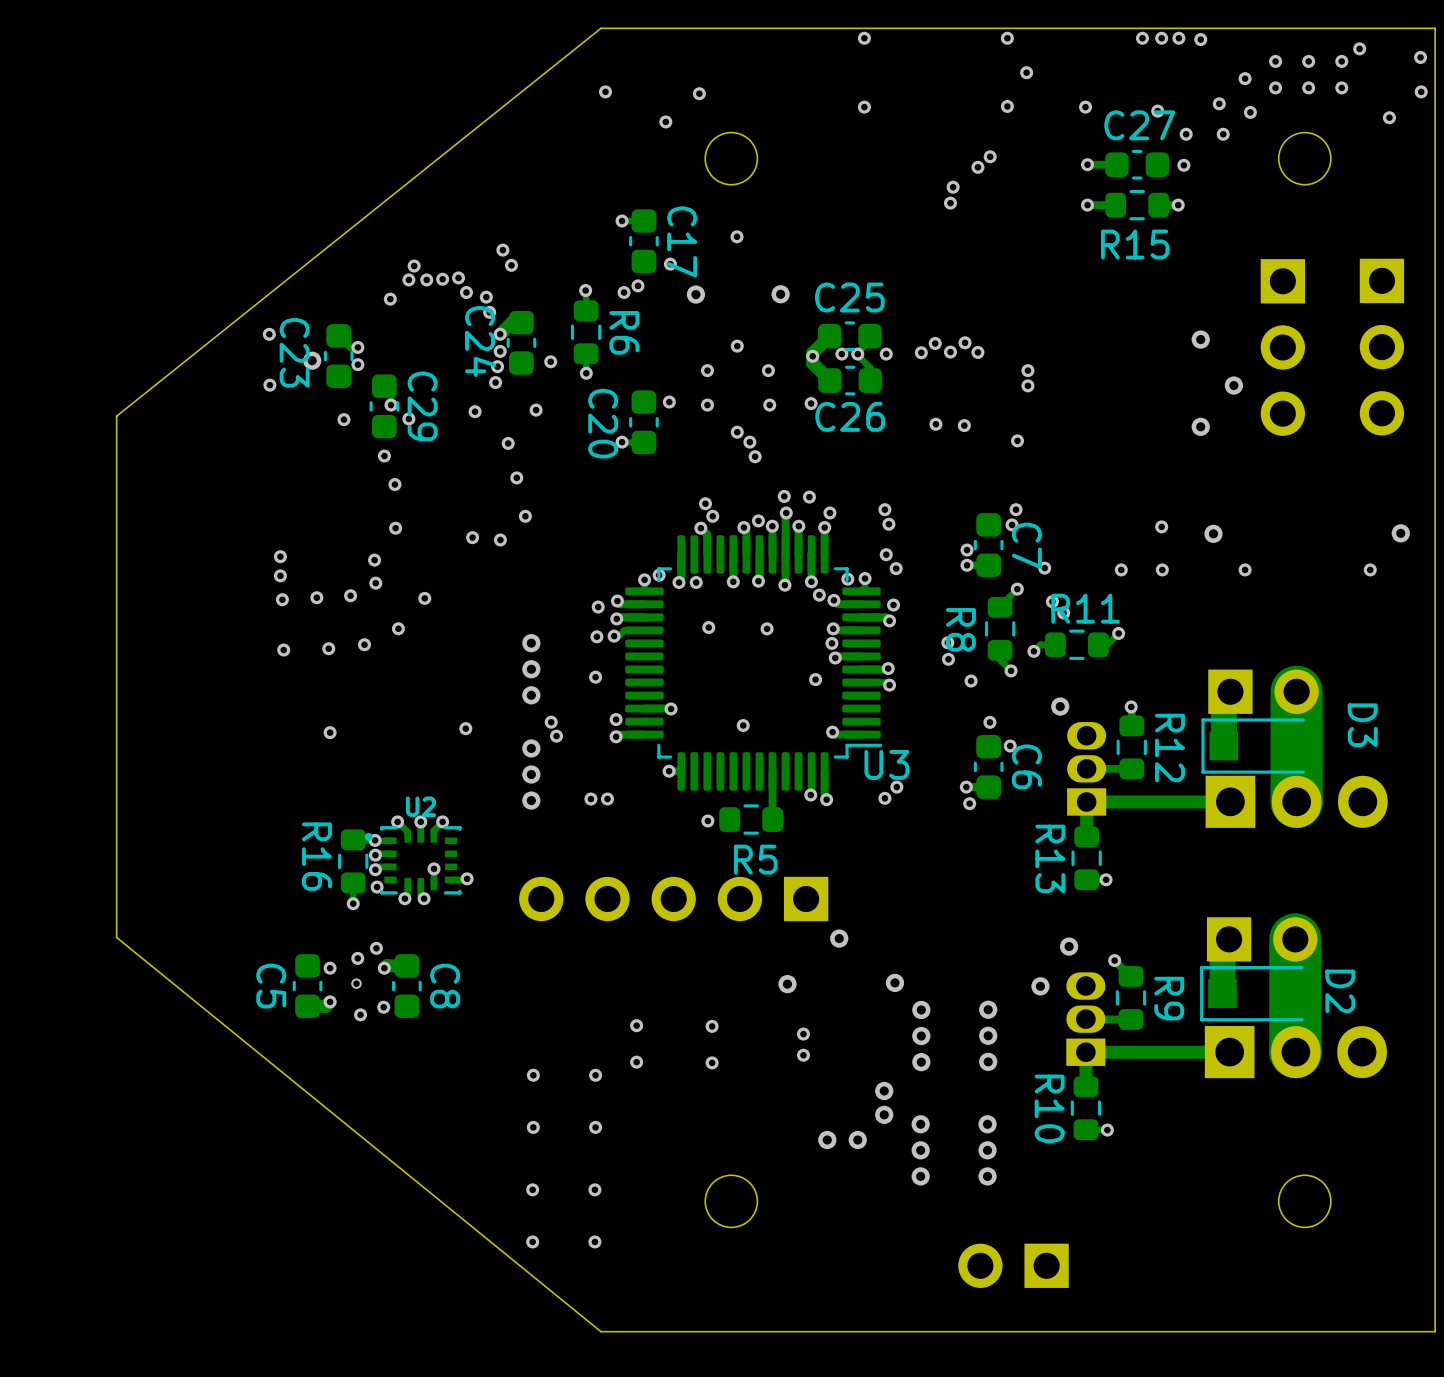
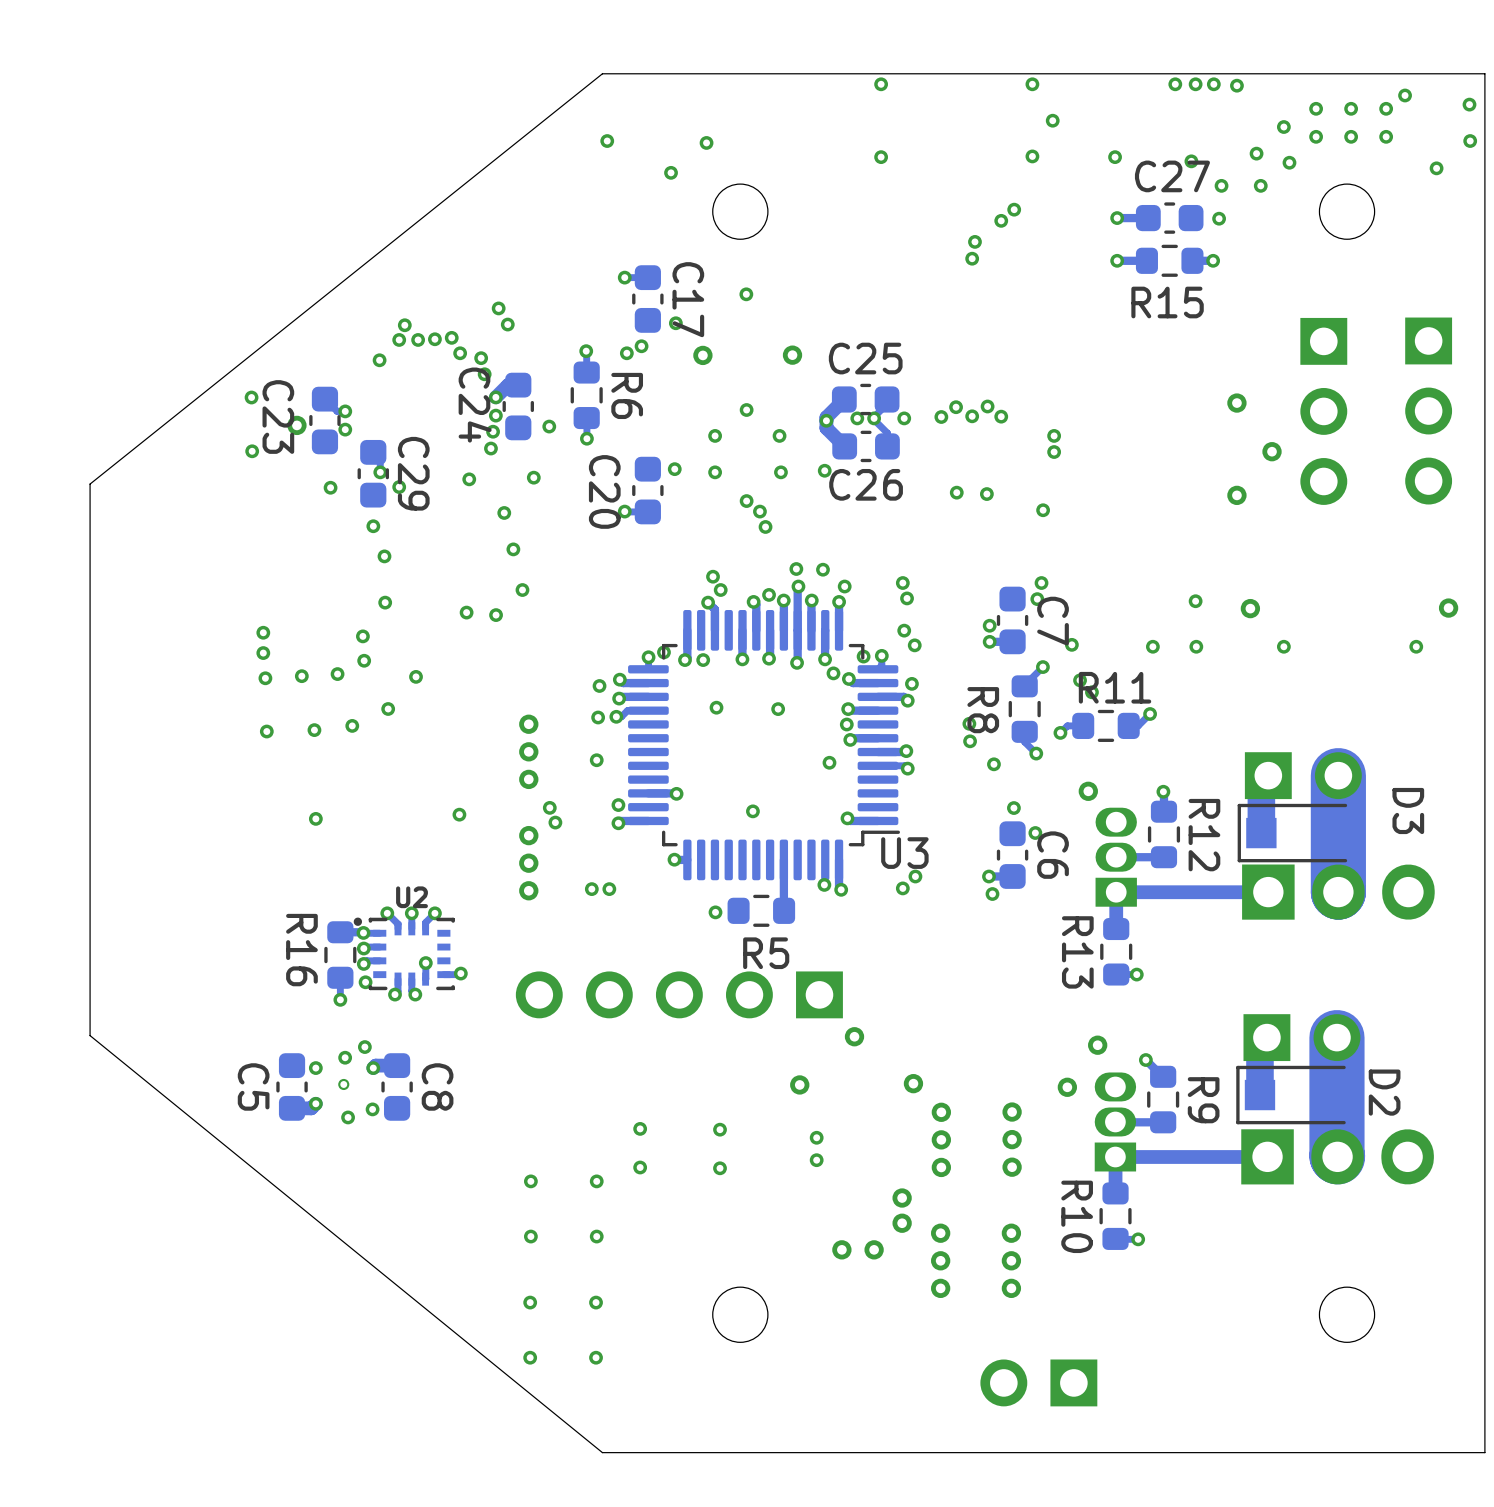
U2 footprint: [364, 826, 462, 895] -> [353, 917, 455, 991]

